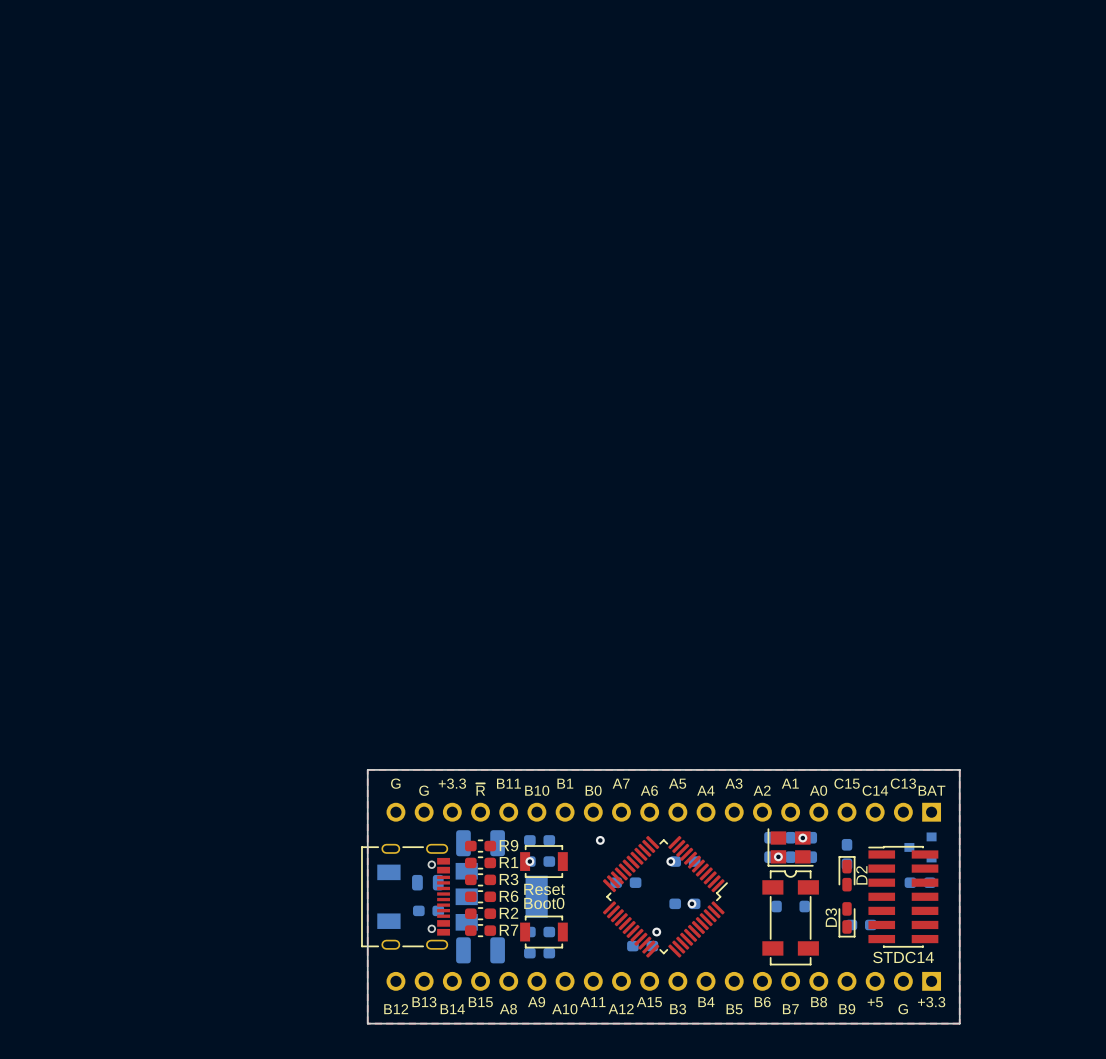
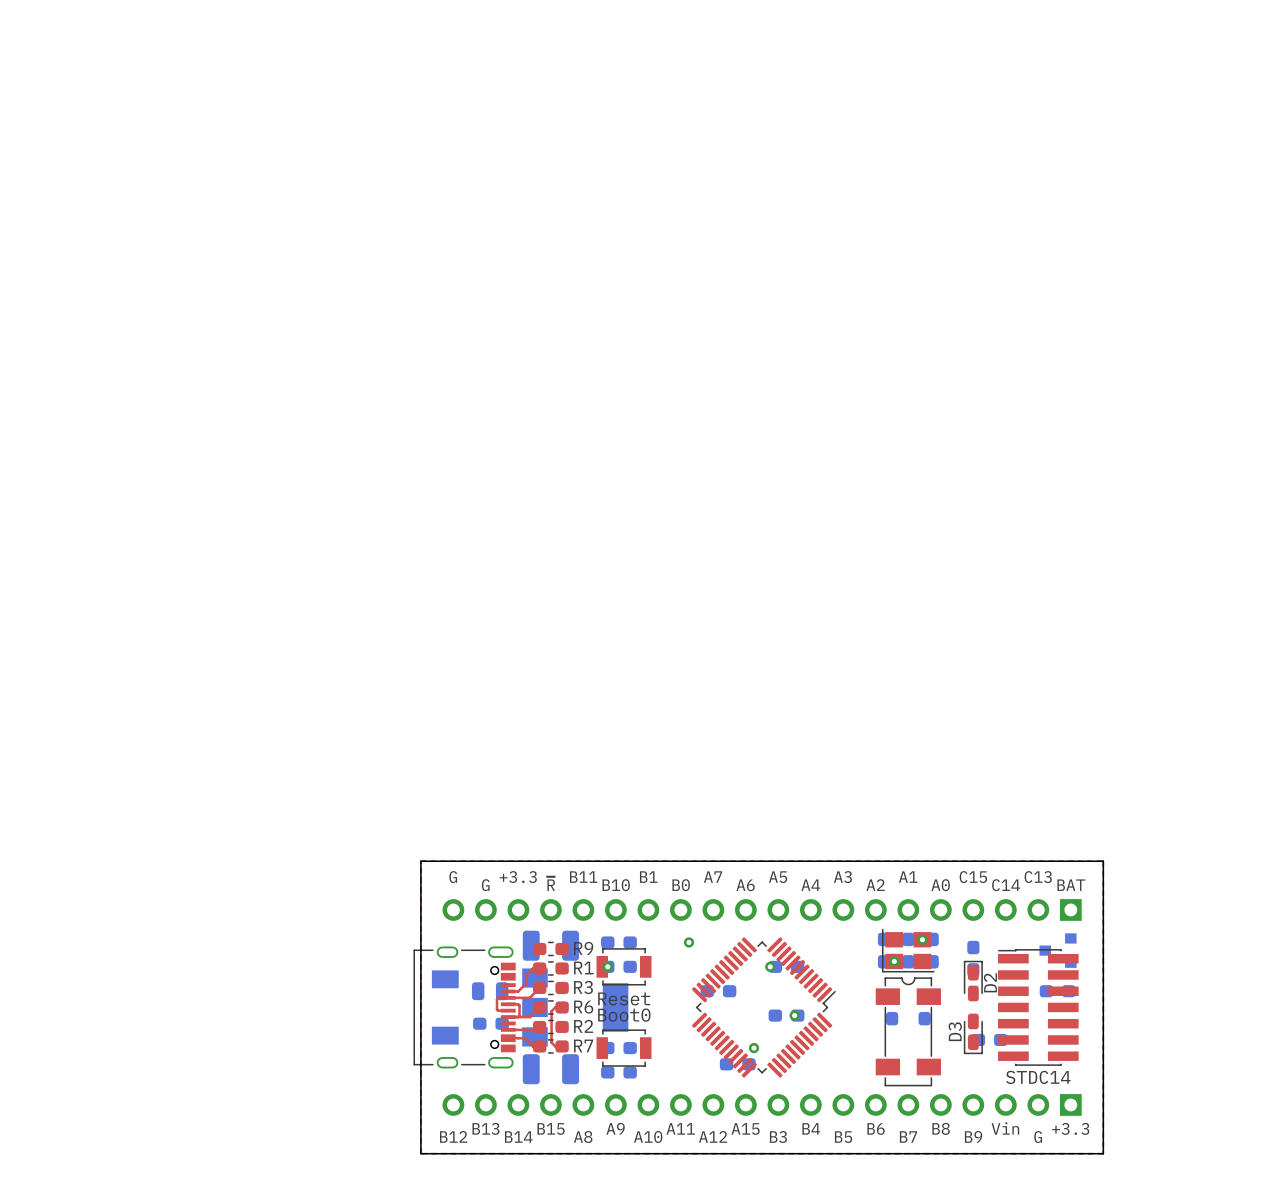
top track: none -> (539, 968) (532, 968) (526, 974) (526, 983) (518, 991) (508, 991)
top track: none -> (539, 987) (529, 997) (498, 997) (497, 1009) (508, 1010)
top track: none -> (508, 1004) (519, 1005) (518, 1017)
top track: none -> (539, 1007) (530, 1017) (508, 1017)
top track: none -> (562, 1007) (555, 1007) (551, 1011) (551, 1042) (555, 1046) (562, 1046)
top track: none -> (539, 1026) (536, 1029) (508, 1029)
top track: none -> (508, 1038) (524, 1038) (532, 1046) (539, 1046)
text: +5 (875, 1002) -> Vin (1005, 1128)

